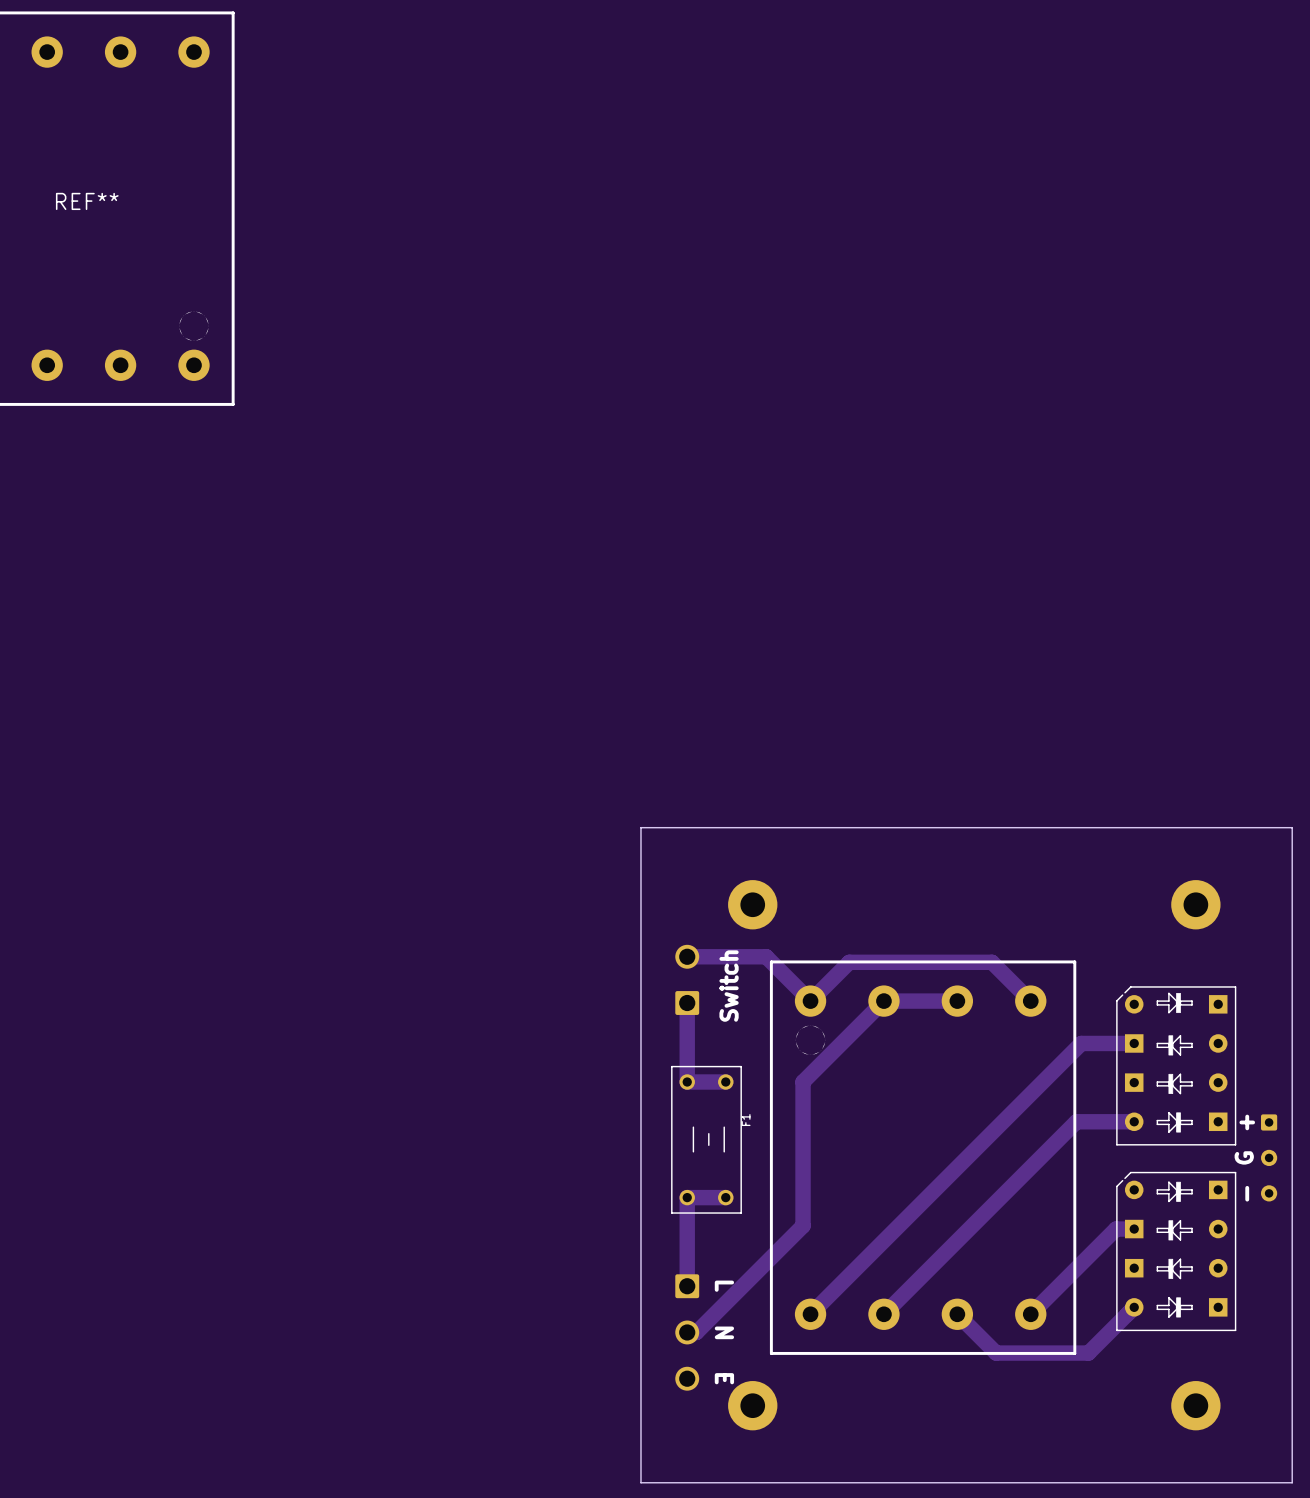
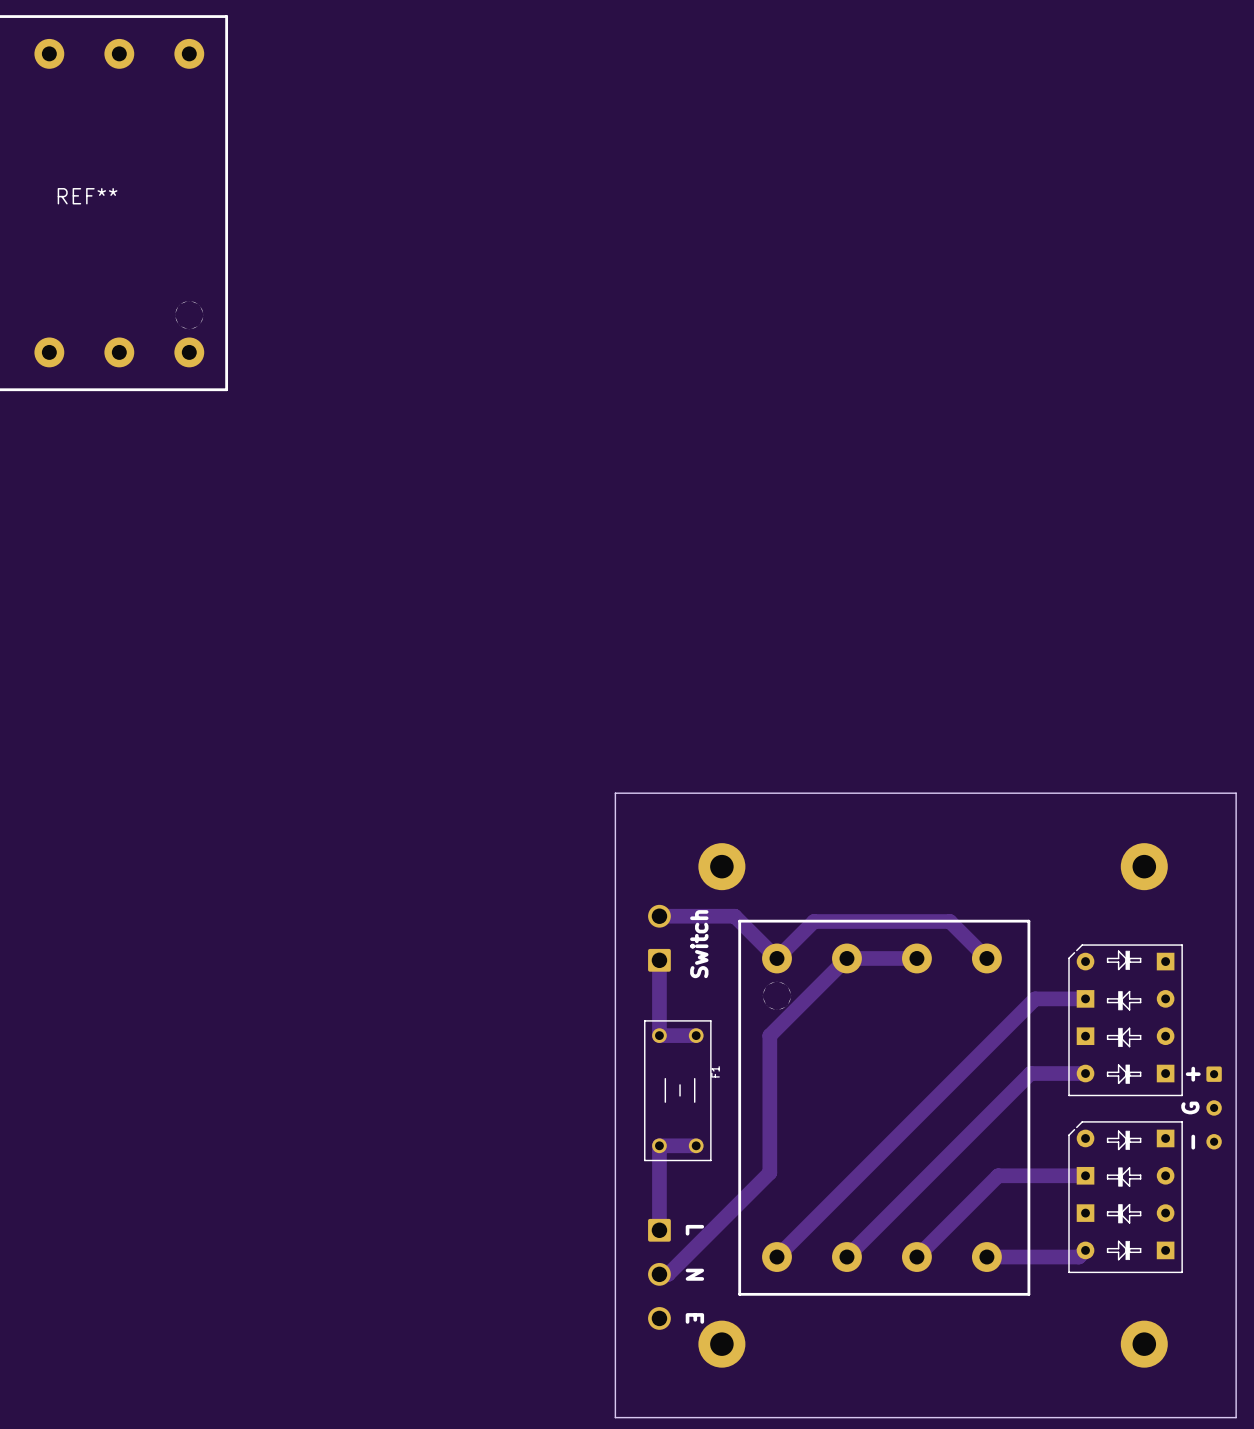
track: (1116, 1229) (1030, 1314) -> (1068, 1175) (998, 1175) (916, 1257)
track: (957, 1314) (996, 1353) (1088, 1353) (1127, 1314) -> (986, 1257) (1078, 1257)

